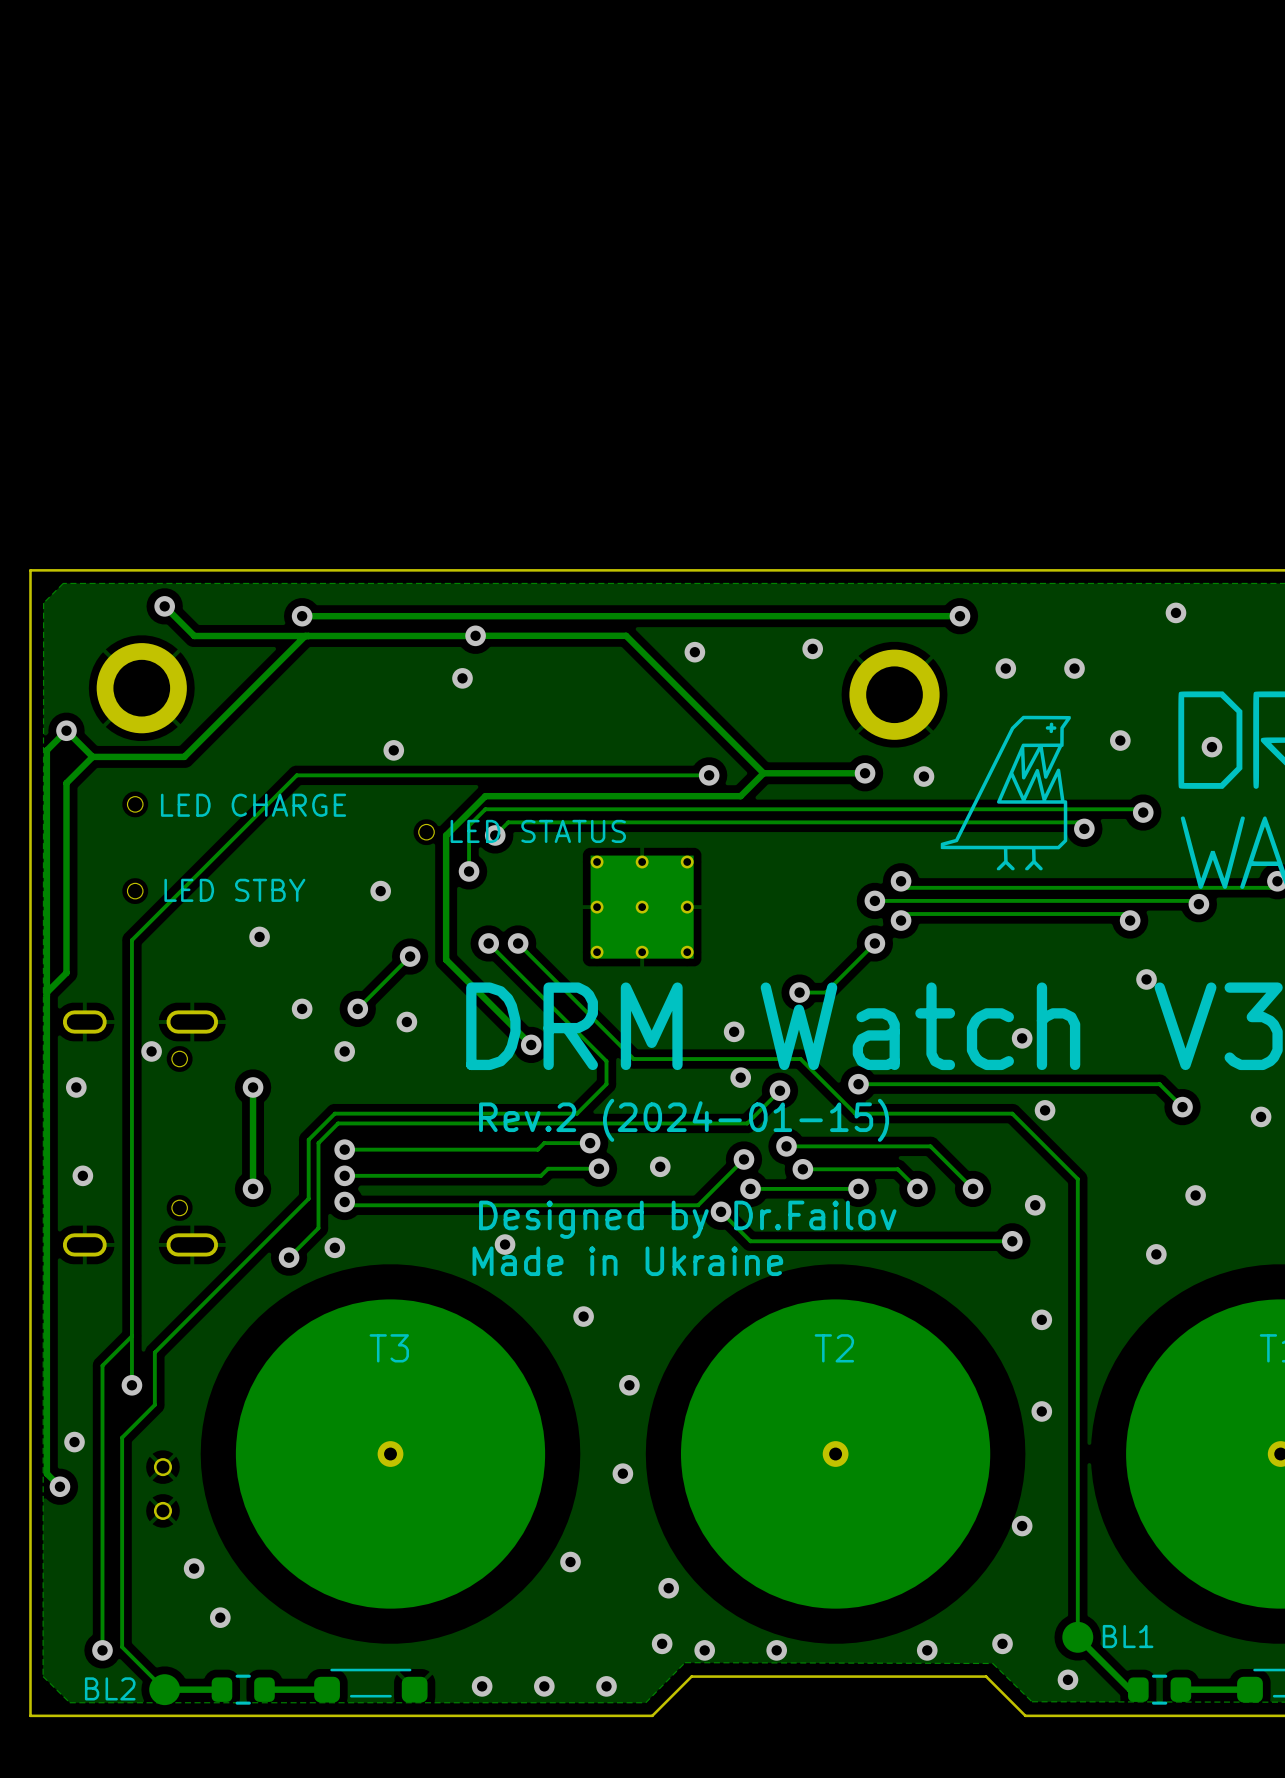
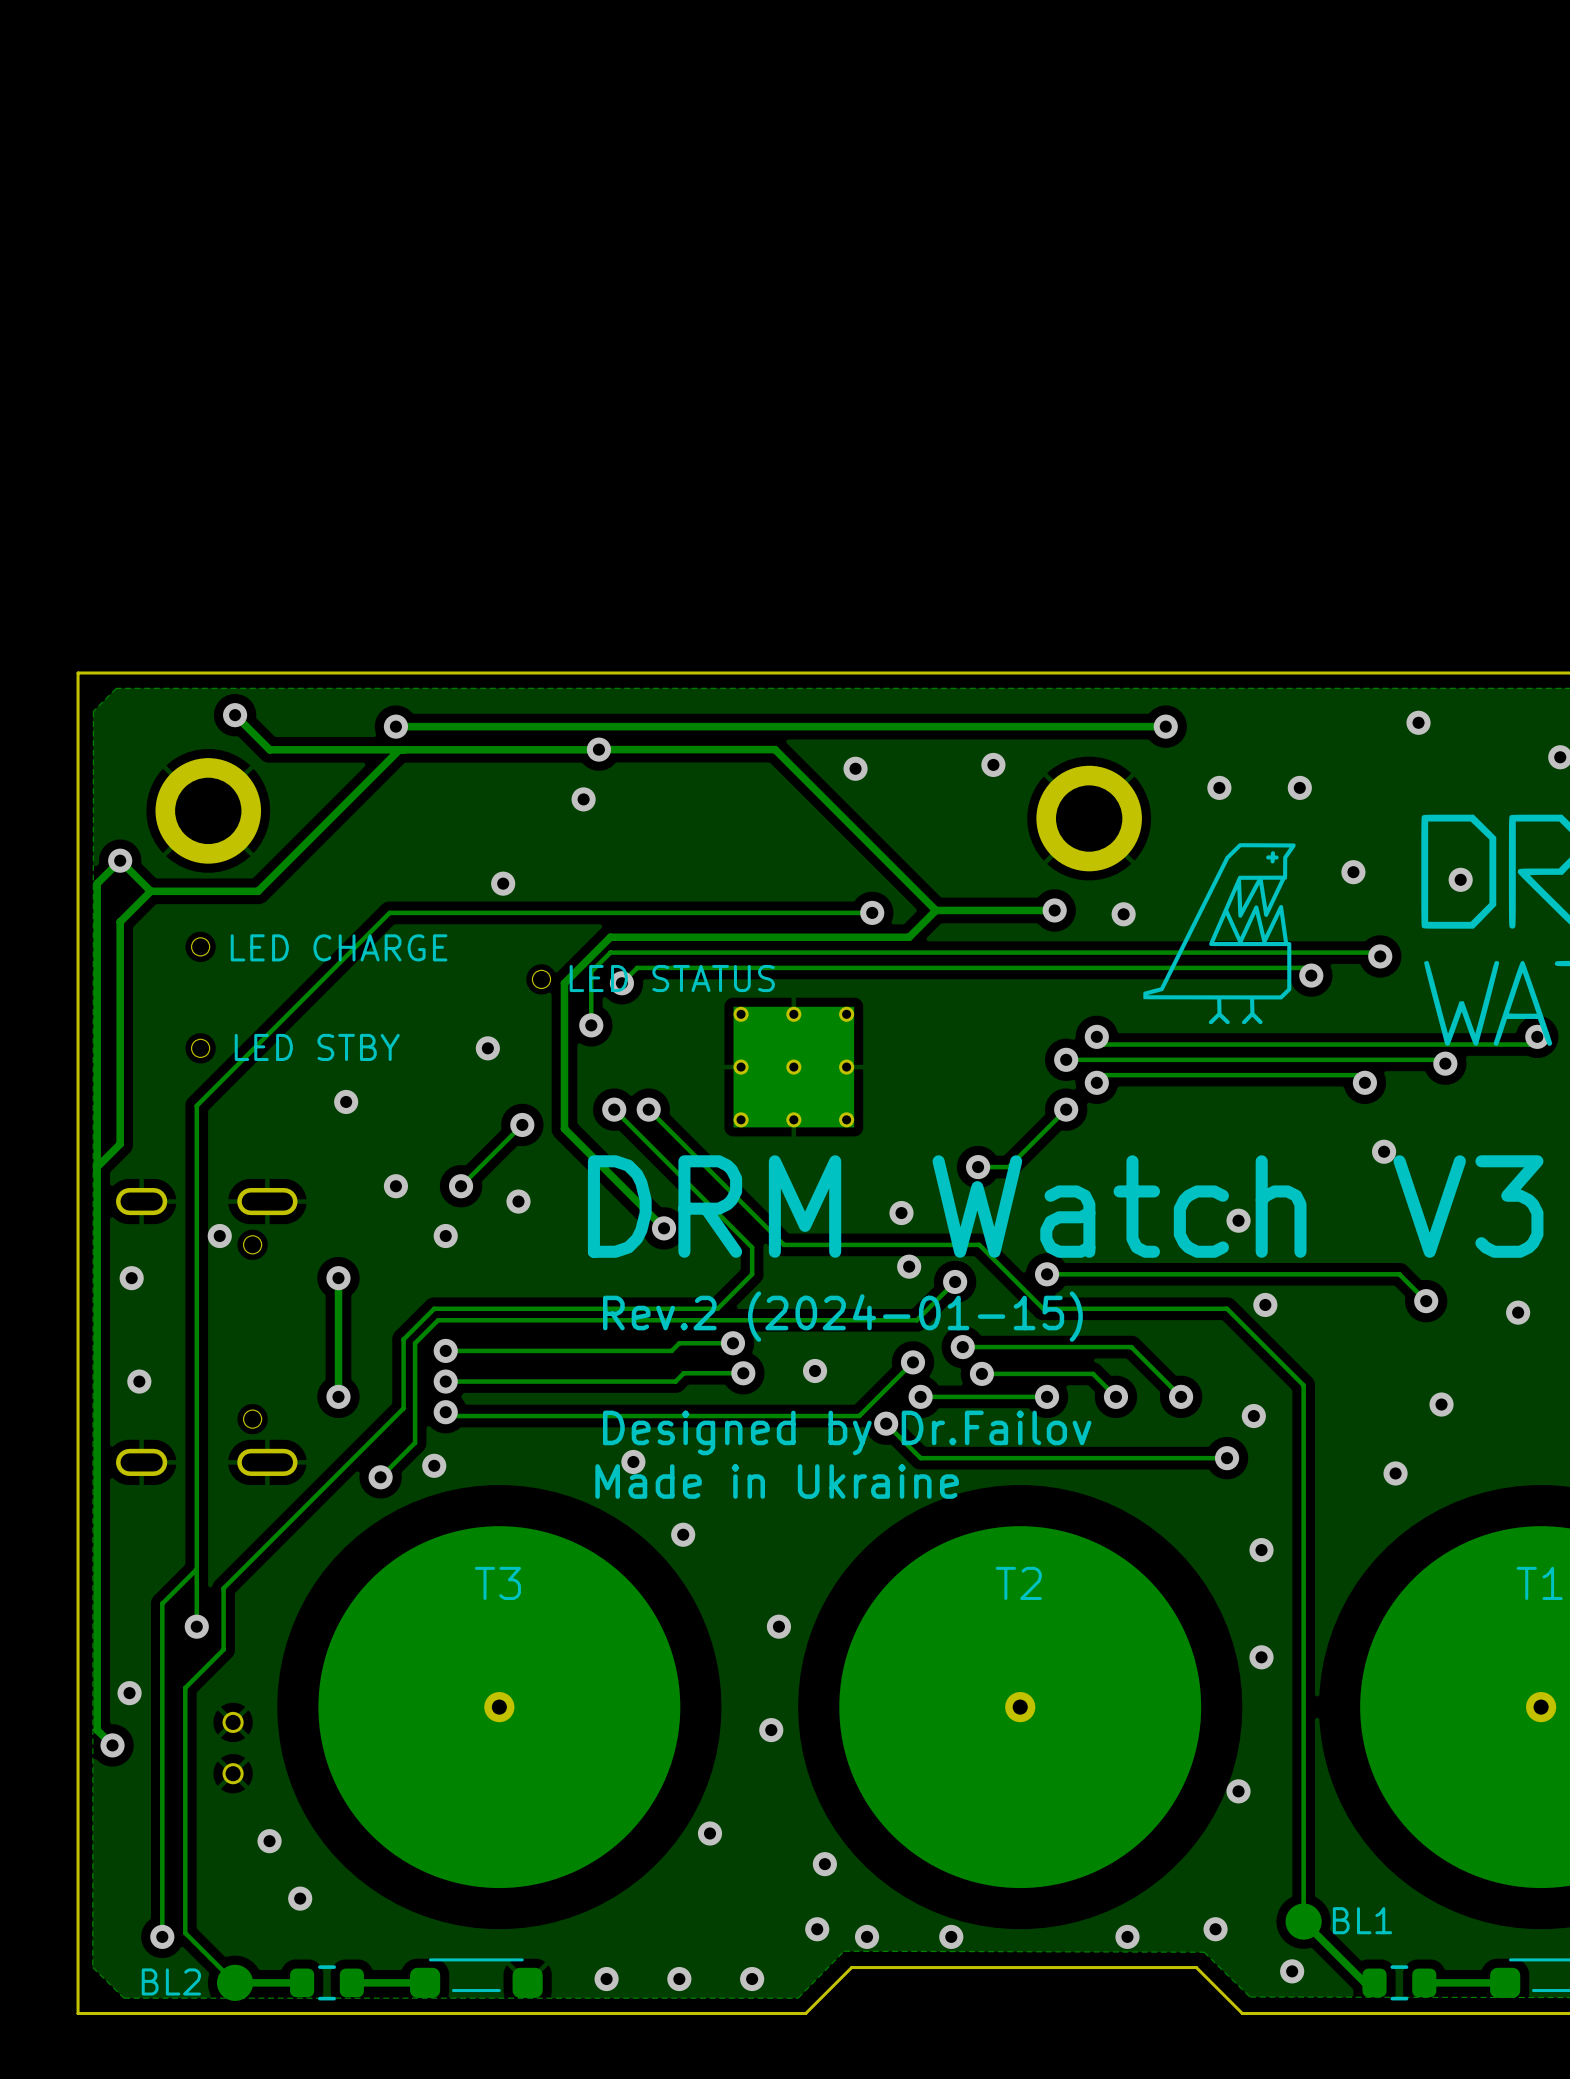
via position: (583, 1316) -> (683, 1534)

